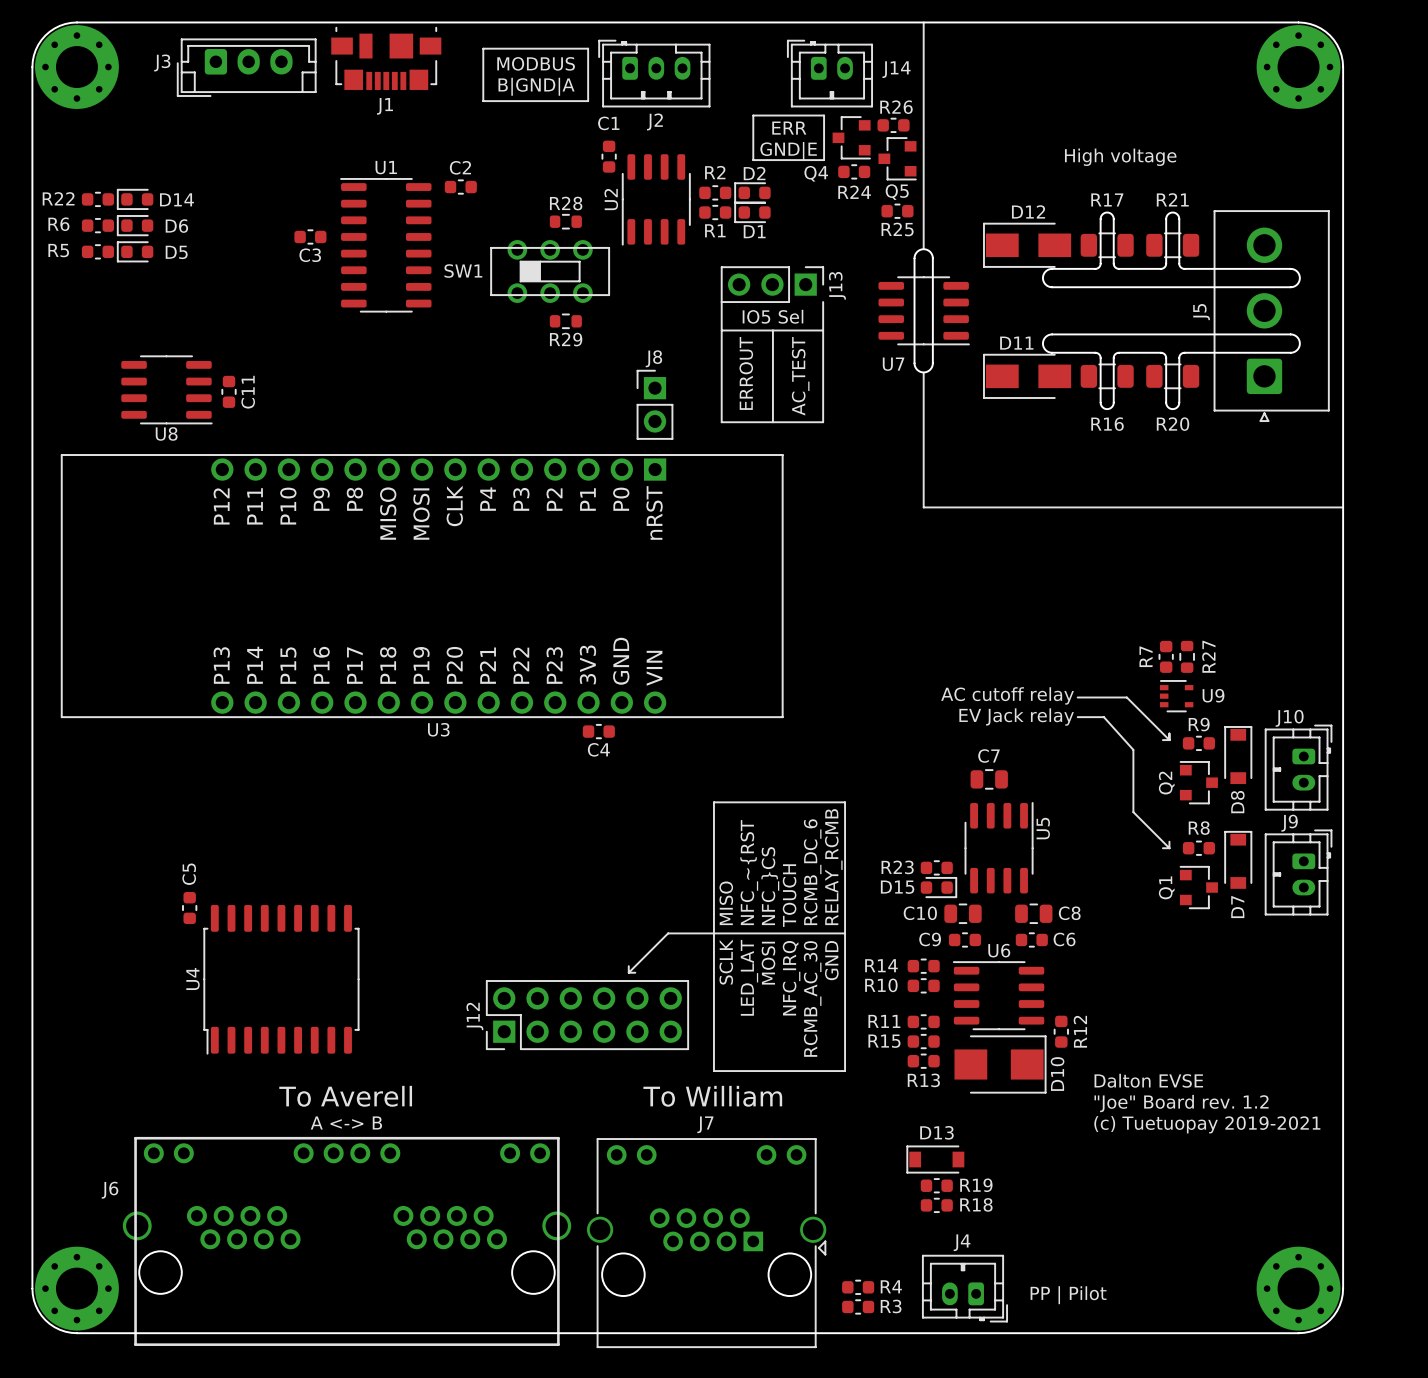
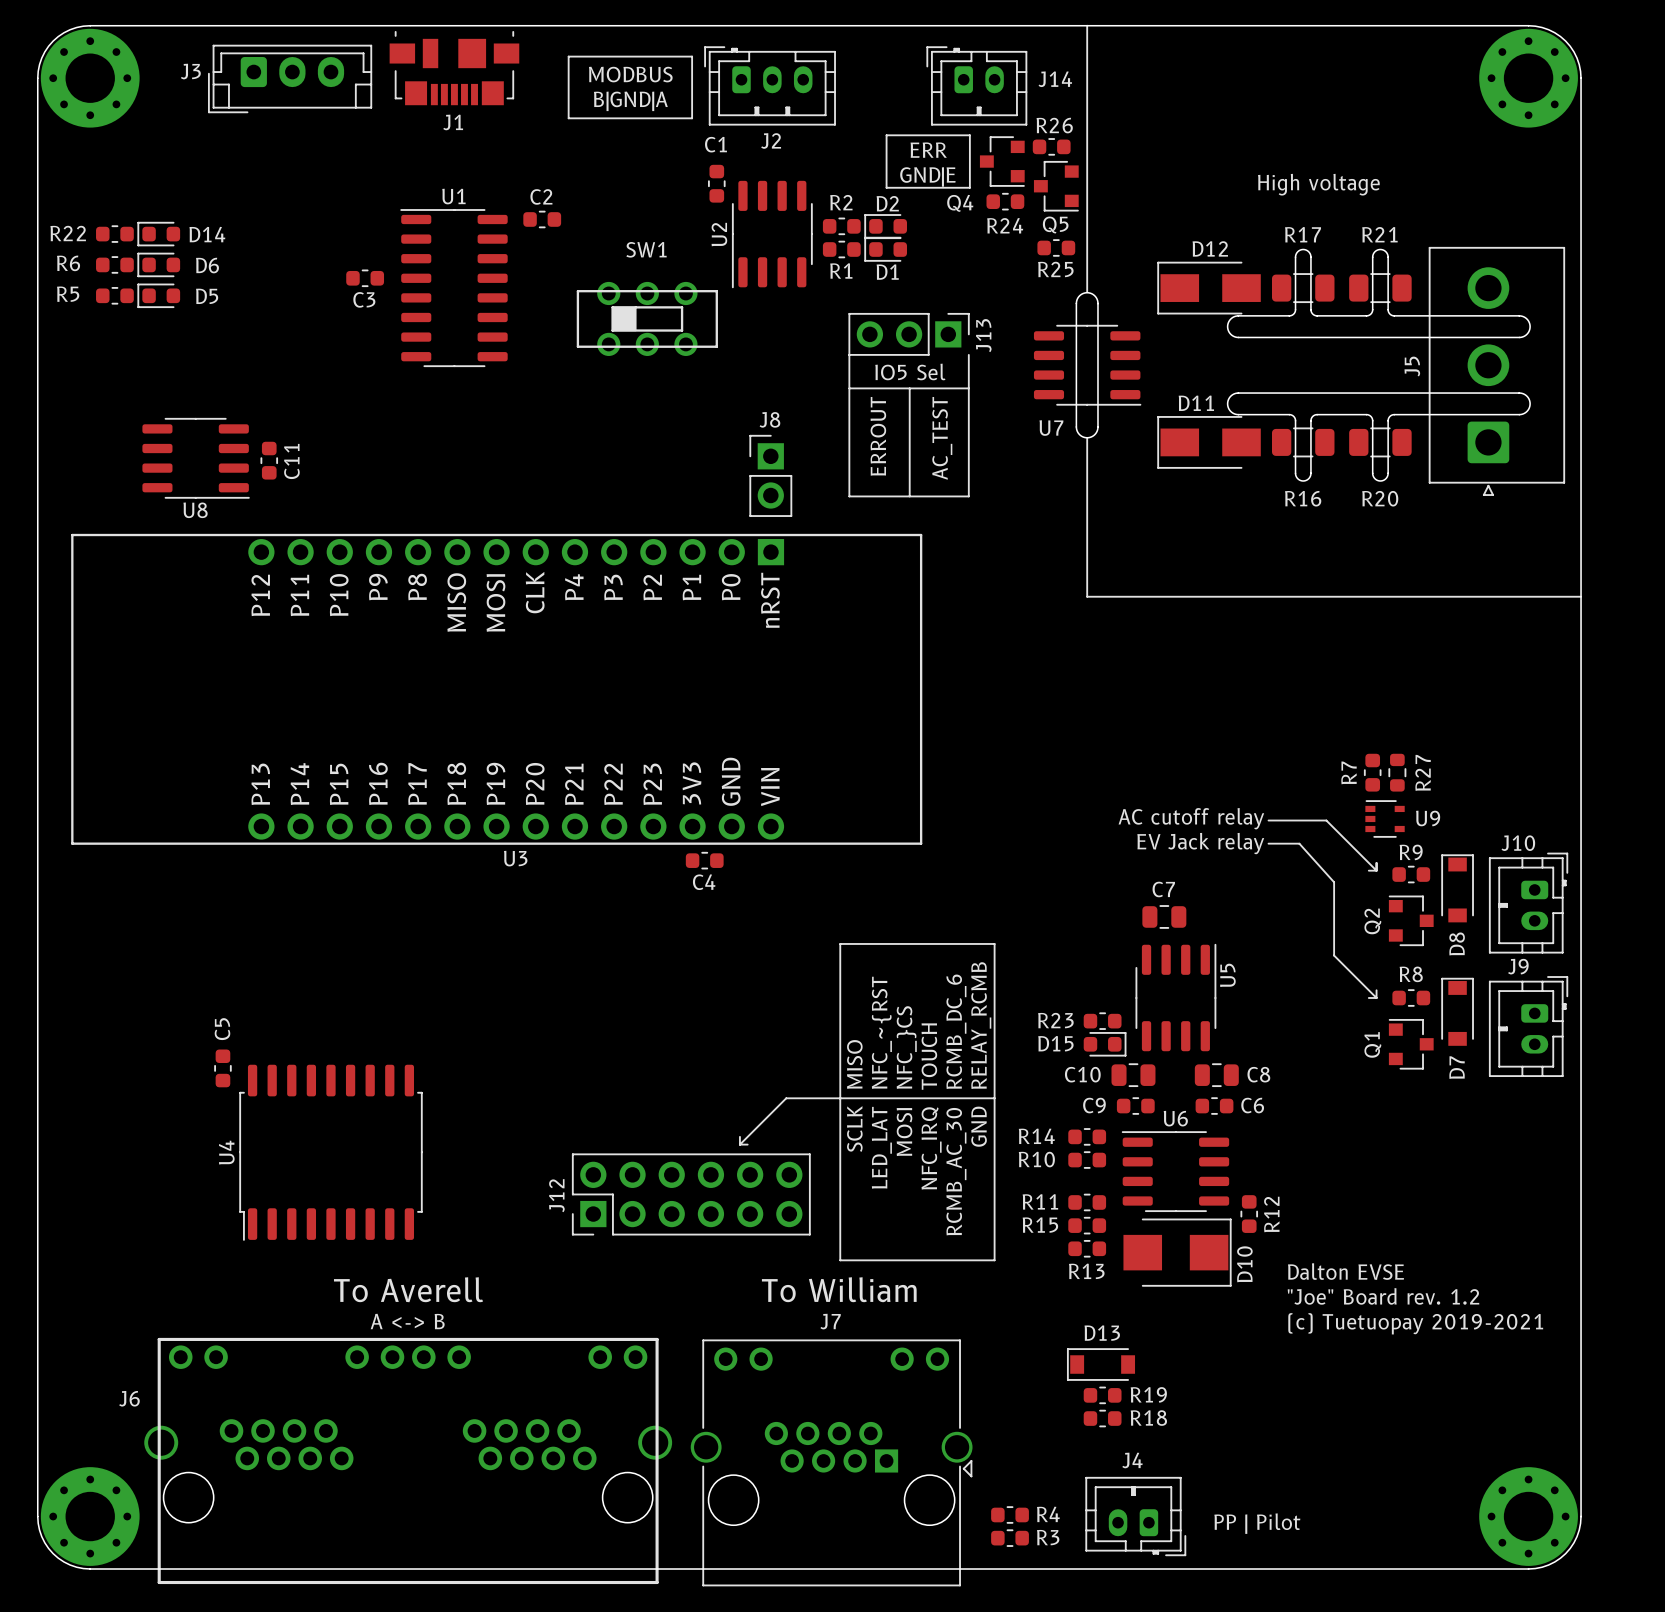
R28: (565, 221) -> none
SW1 name position: SW1 (463, 271) -> SW1 (646, 249)
R29: (565, 321) -> none

